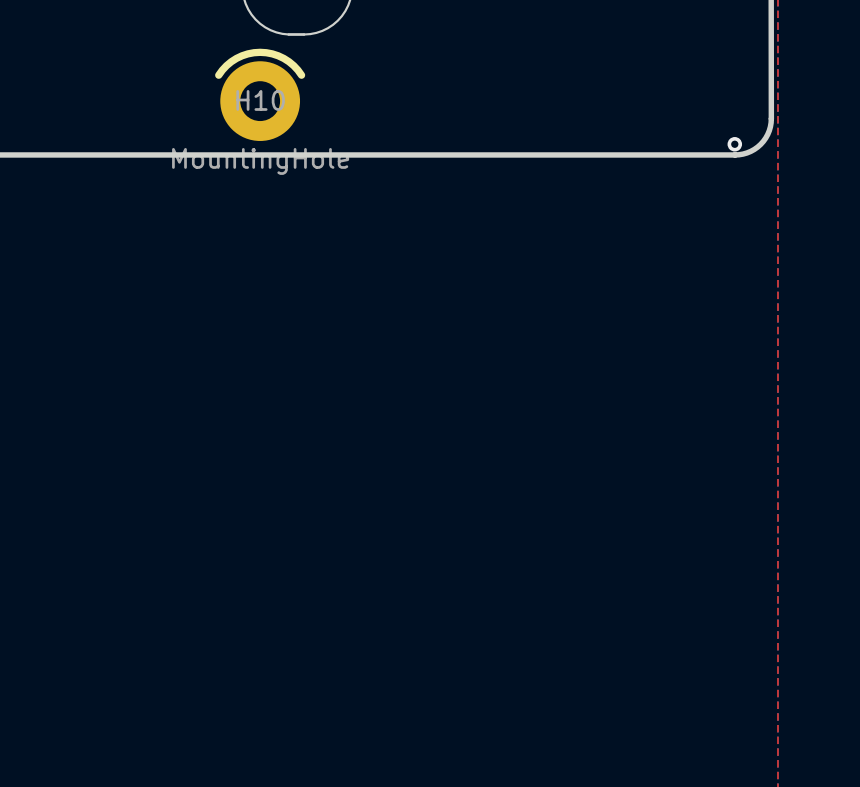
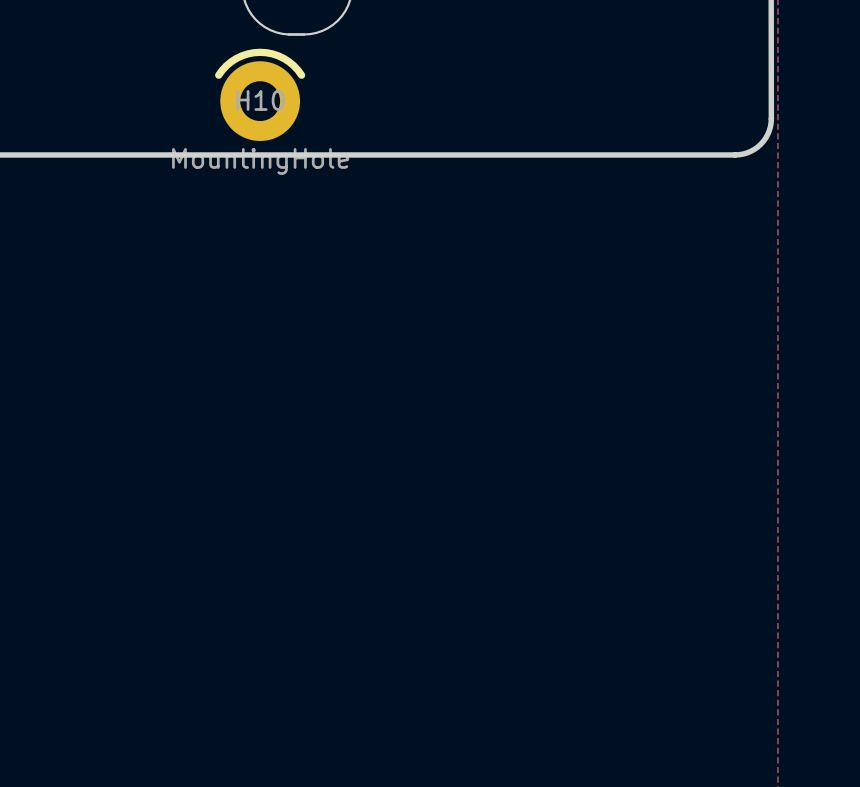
via: (734, 144) -> none

